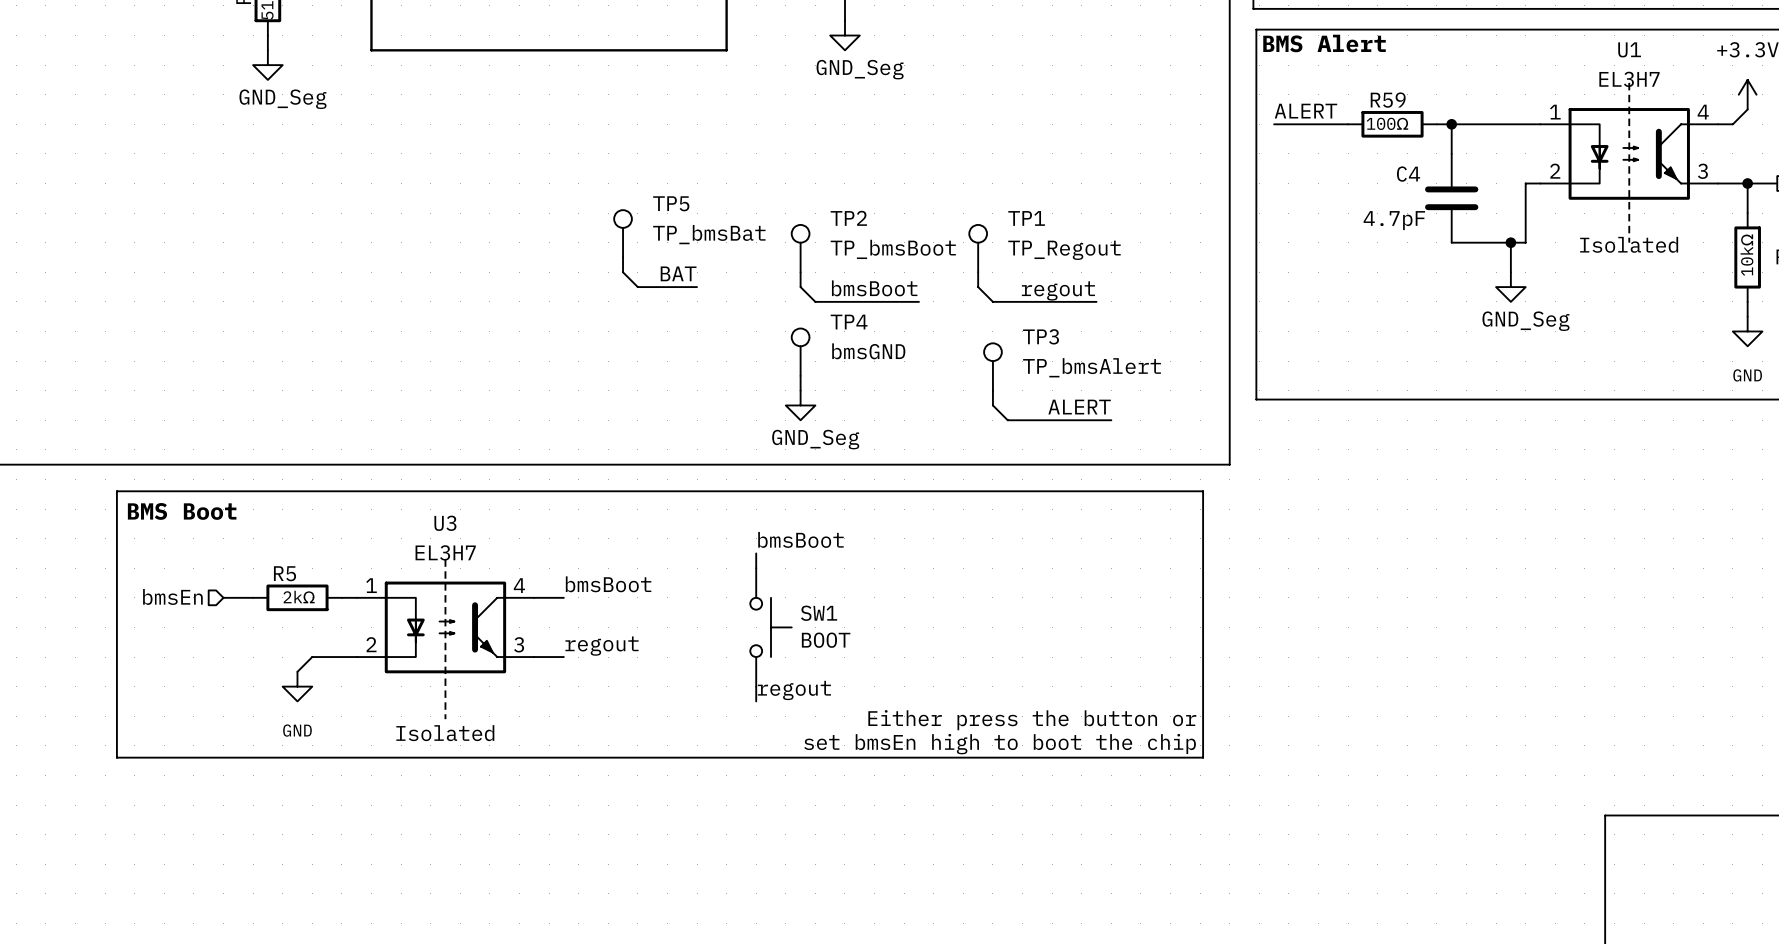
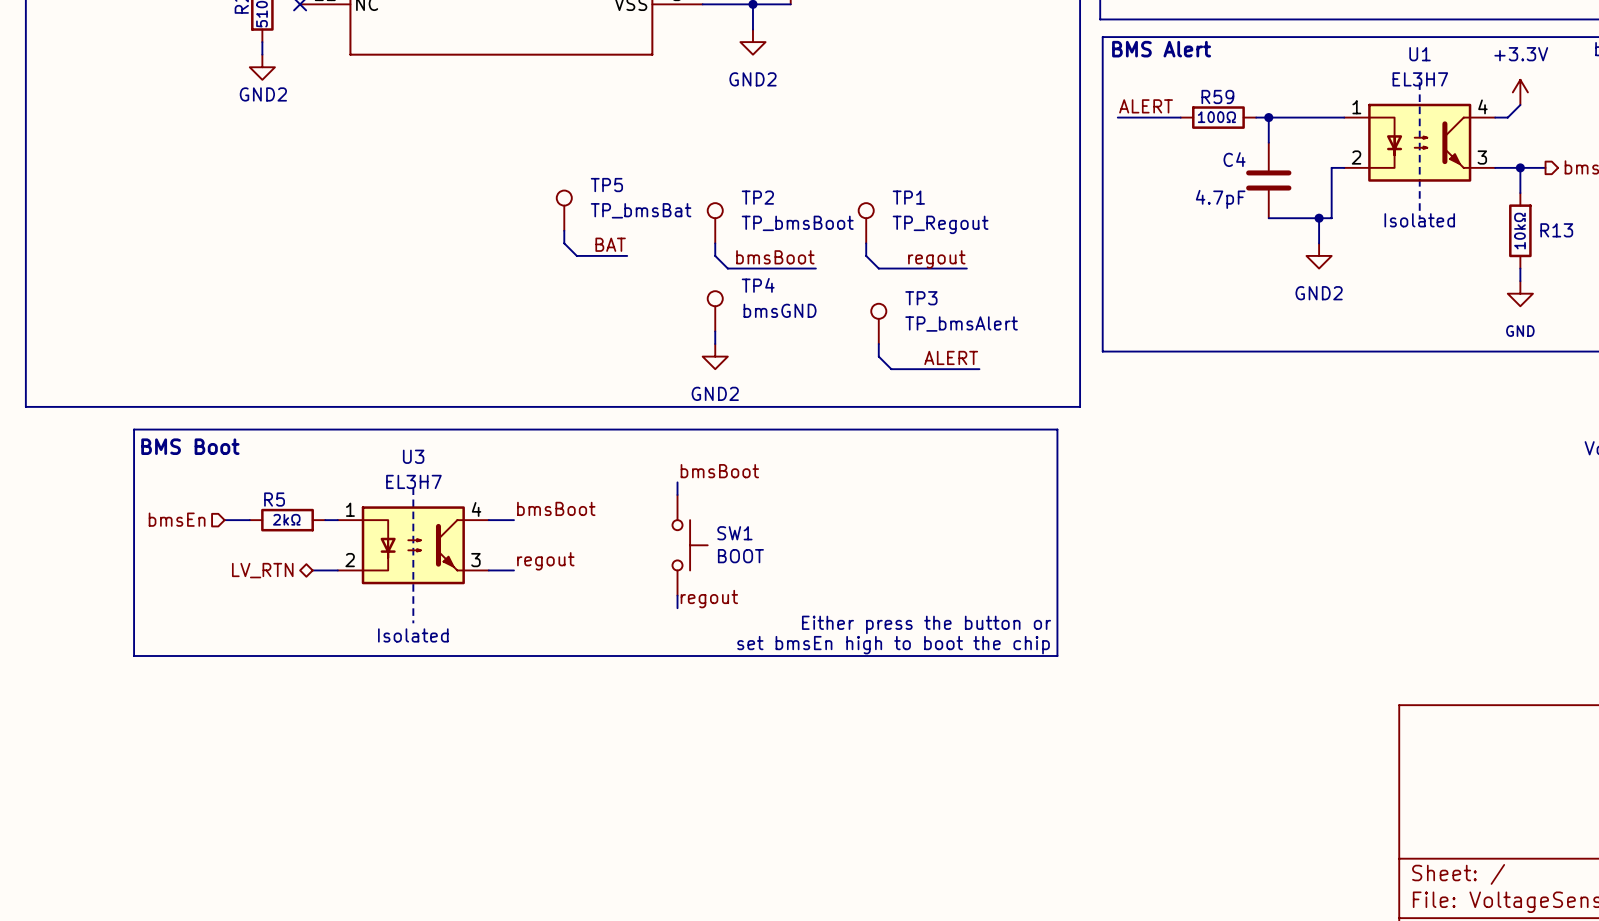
power symbol: GND_Seg (844, 35) -> GND2 (752, 42)
power symbol: GND_Seg (267, 65) -> GND2 (262, 67)
power symbol: GND_Seg (1510, 287) -> GND2 (1319, 255)
power symbol: GND_Seg (800, 405) -> GND2 (715, 356)
wire: (327, 657) (312, 657) (297, 671) -> none
hierarchical label: none -> LV_RTN (262, 570)
power symbol: GND (297, 686) -> none

